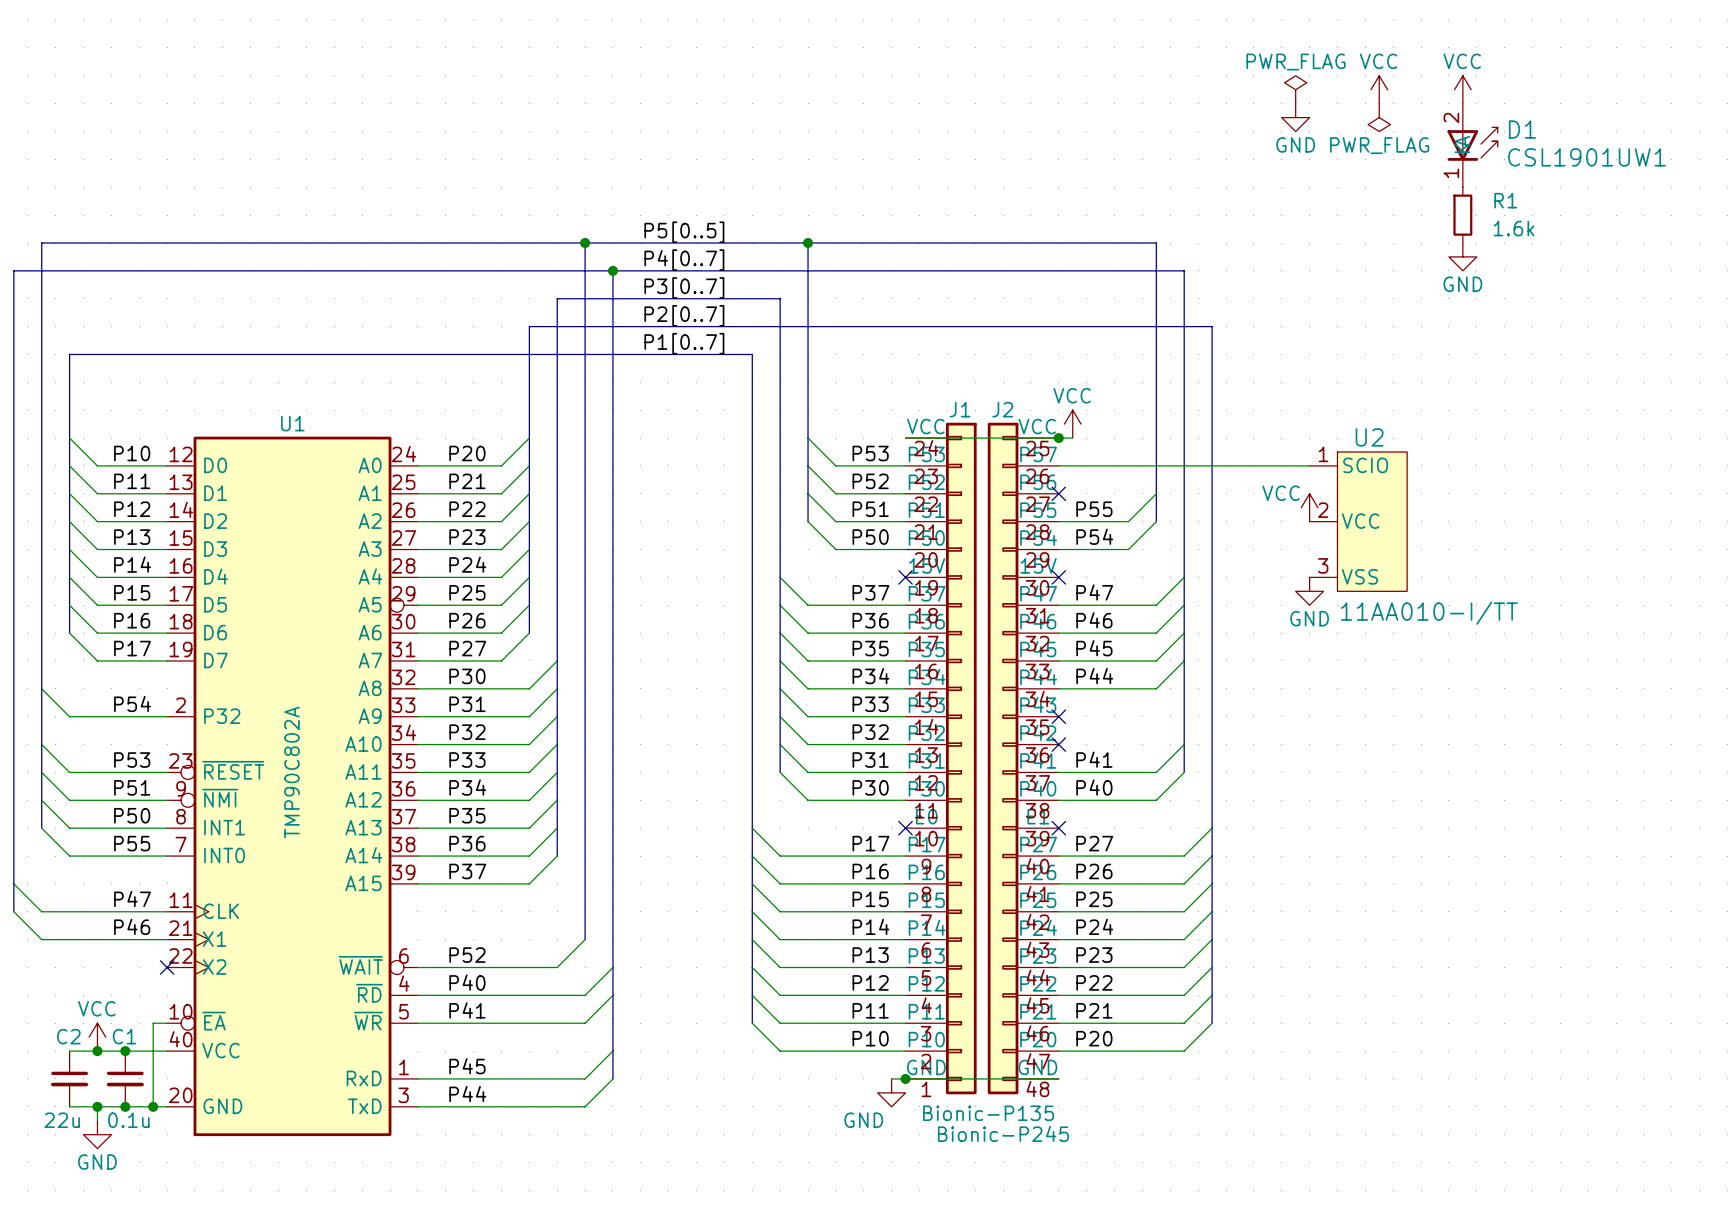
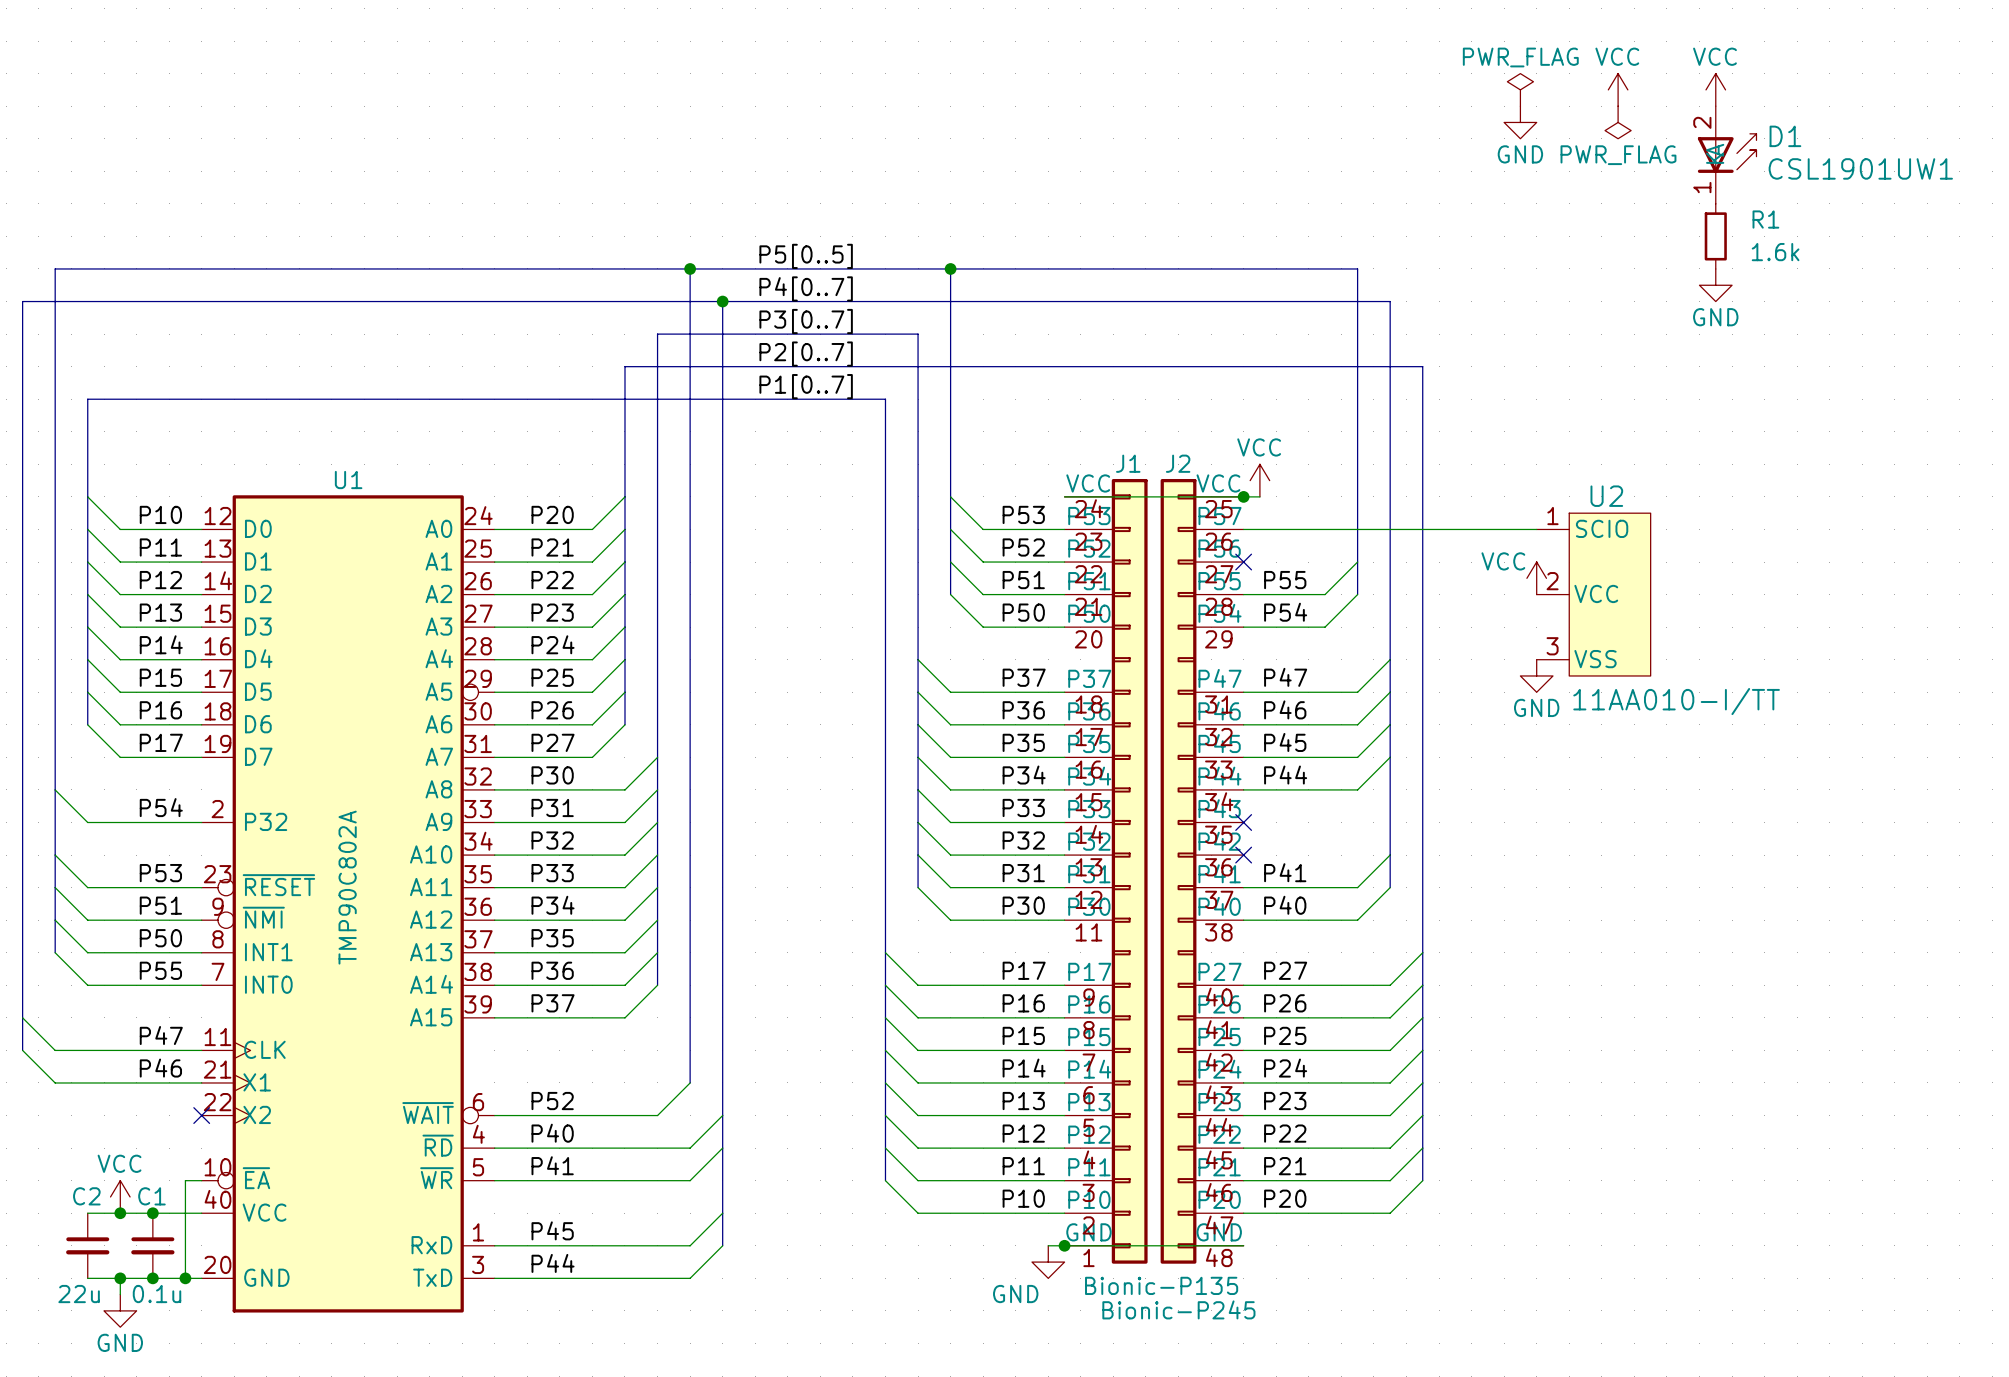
J1 symbol: [905, 422, 977, 1095] -> [1064, 478, 1148, 1264]
J2 symbol: [987, 422, 1059, 1095] -> [1160, 478, 1244, 1264]
no-connect mark: (905, 577) -> none
no-connect mark: (1058, 577) -> none
no-connect mark: (905, 828) -> none
no-connect mark: (1058, 828) -> none

